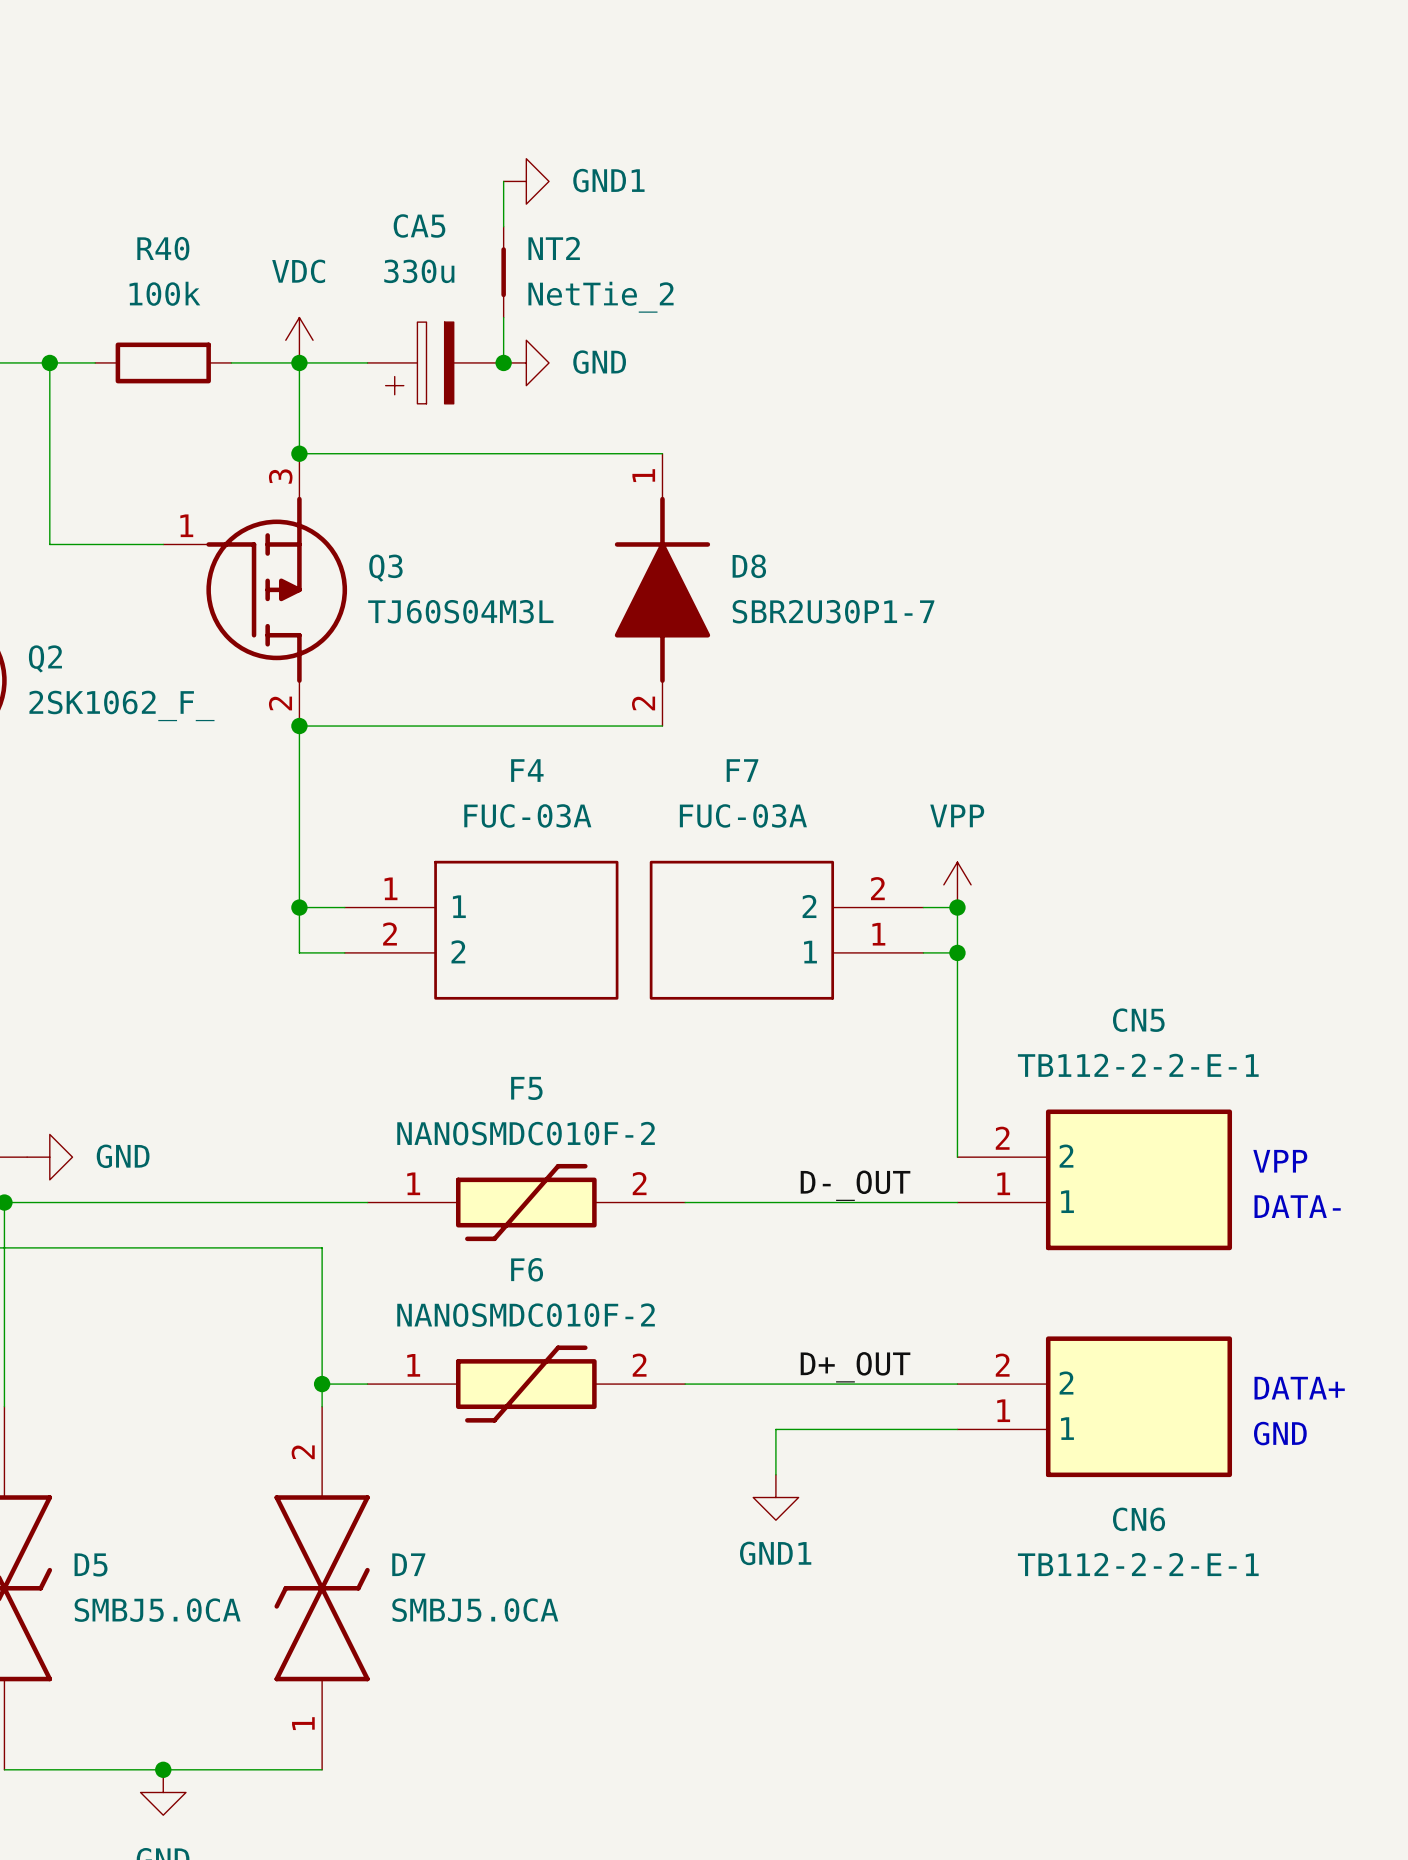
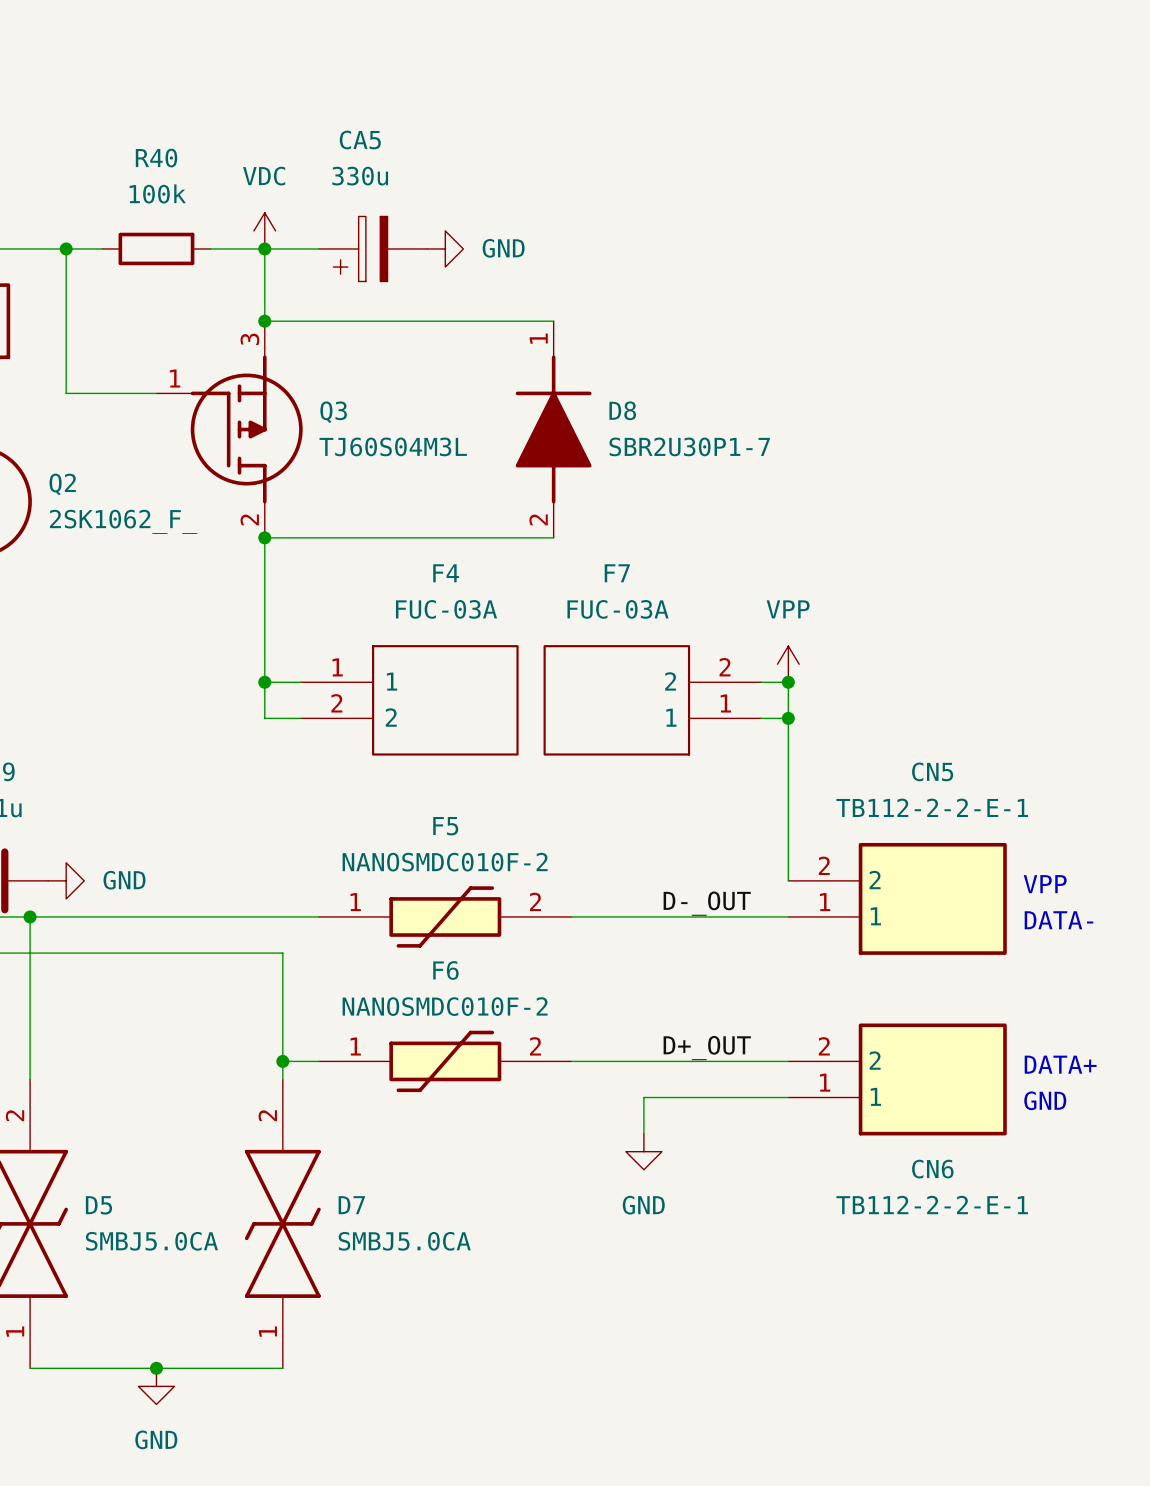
wire: (503, 181) (503, 226) -> none
power symbol: GND1 (526, 181) -> none
NT2: NetTie_2 (503, 272) -> none
wire: (503, 317) (503, 362) -> none
junction: (503, 362) -> none
power symbol: GND1 (775, 1497) -> GND (643, 1151)

